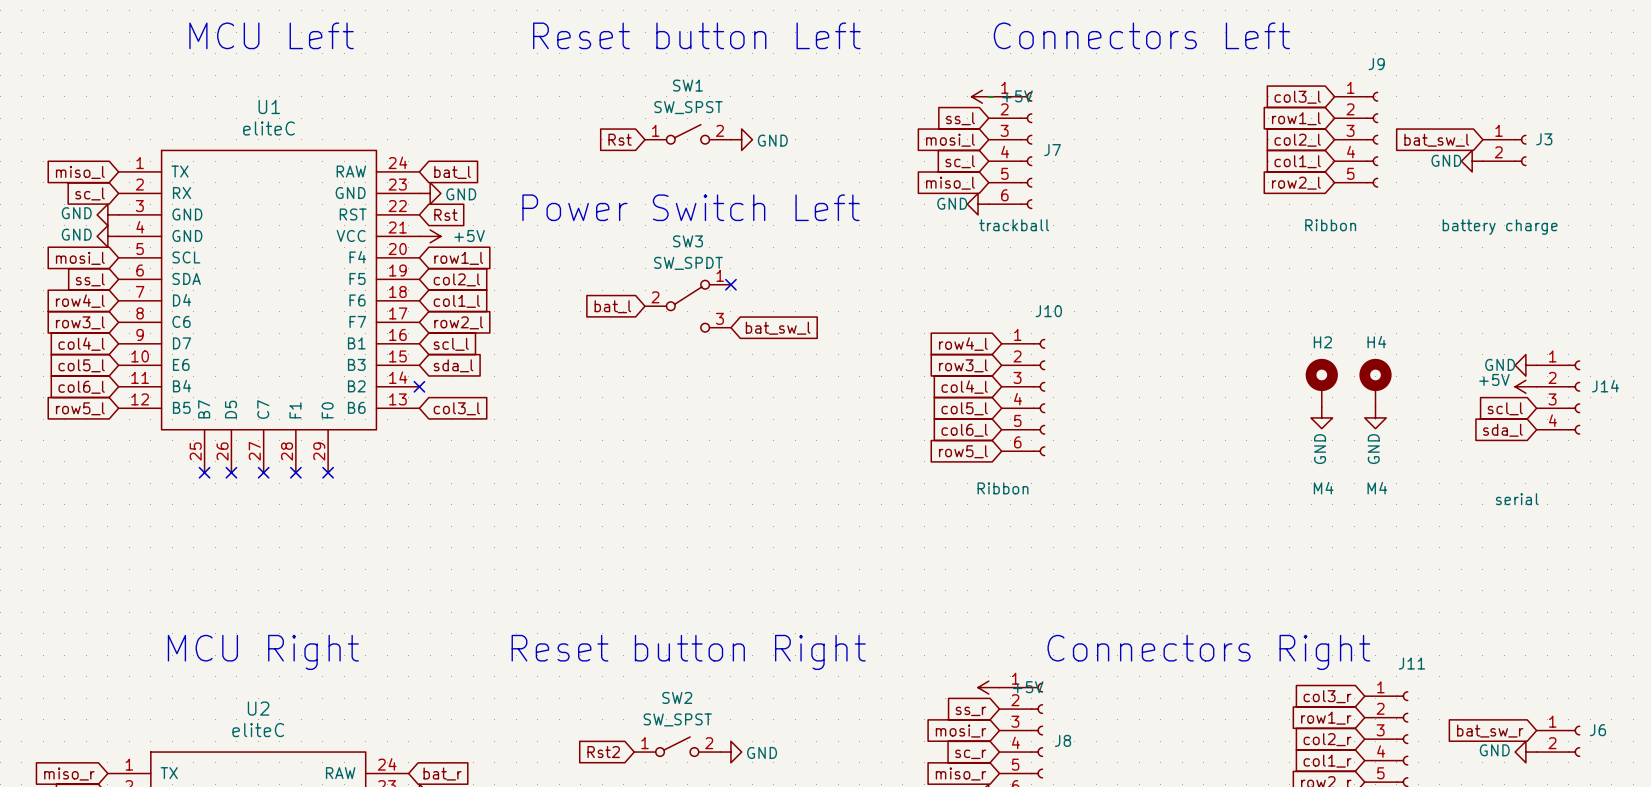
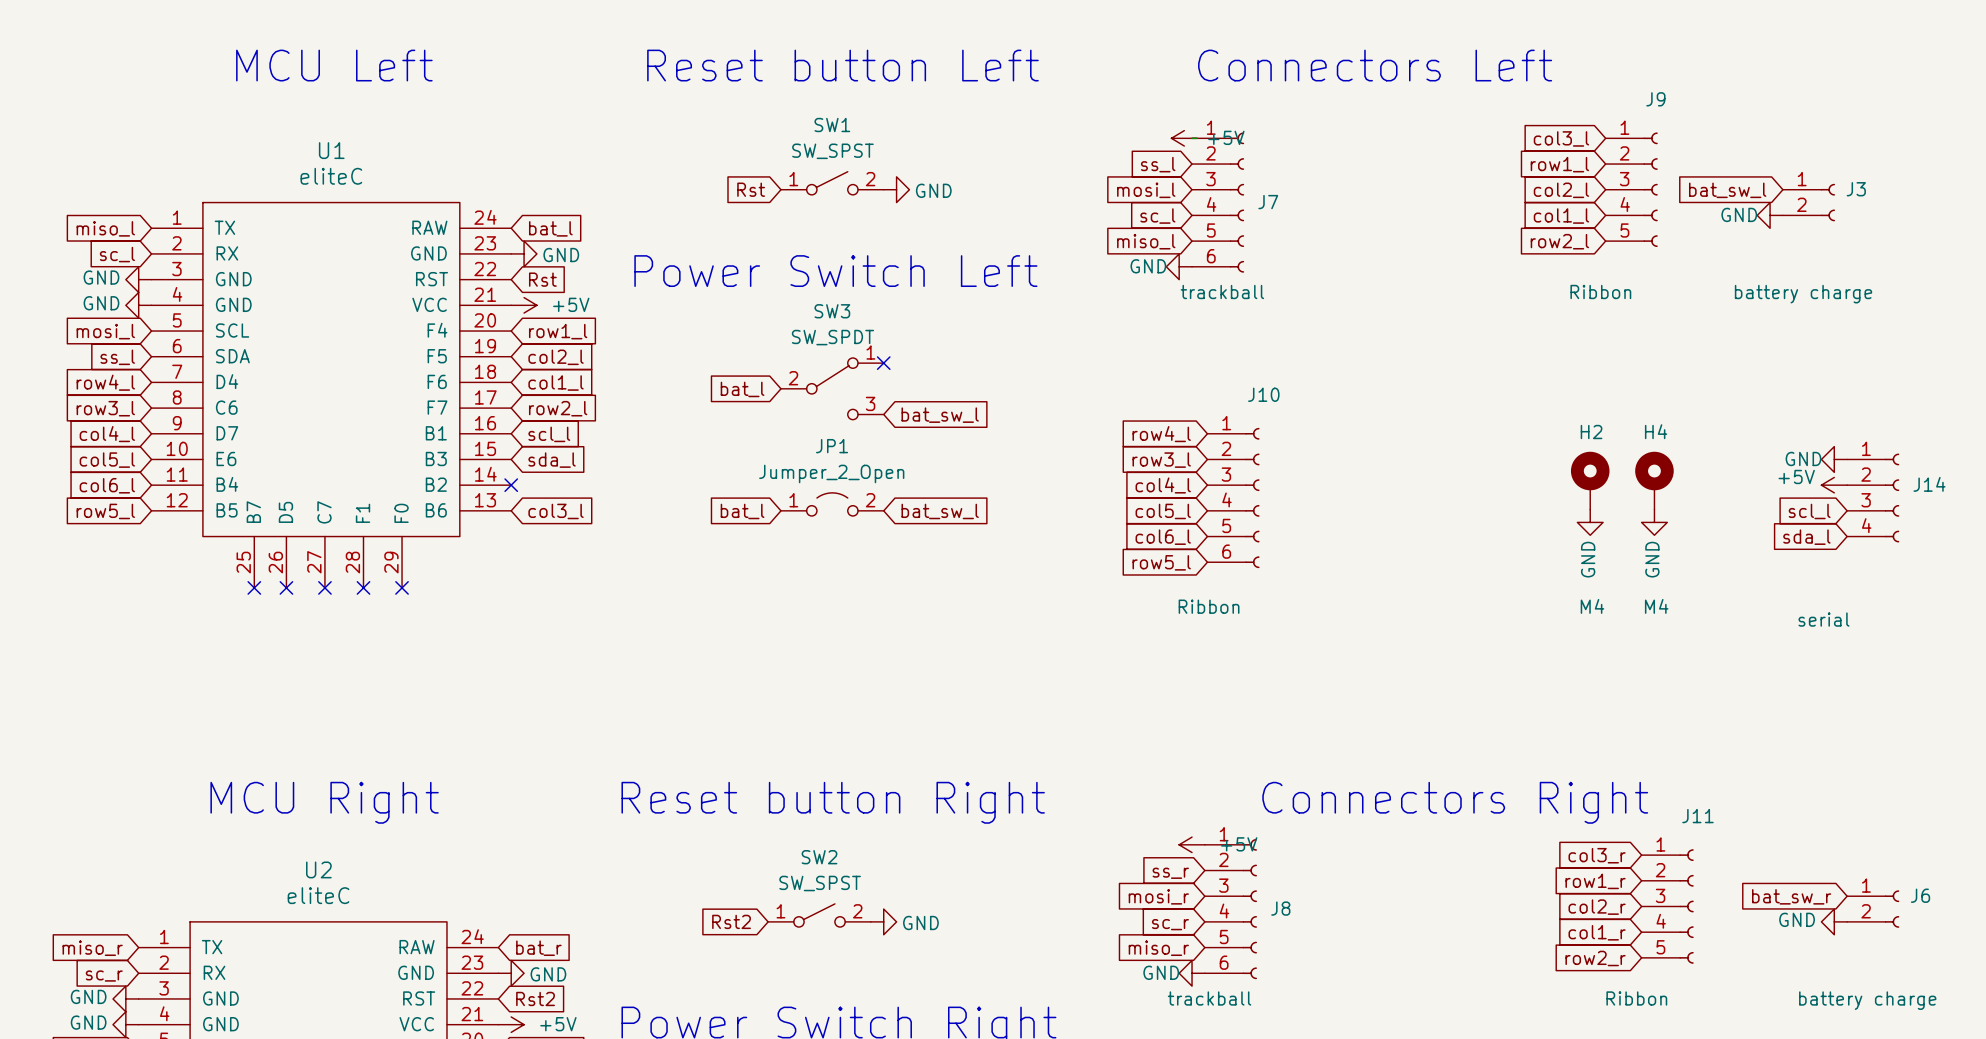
JP1: none -> Jumper_2_Open (832, 504)
global label: none -> bat_l (742, 511)
global label: none -> bat_sw_l (940, 511)

